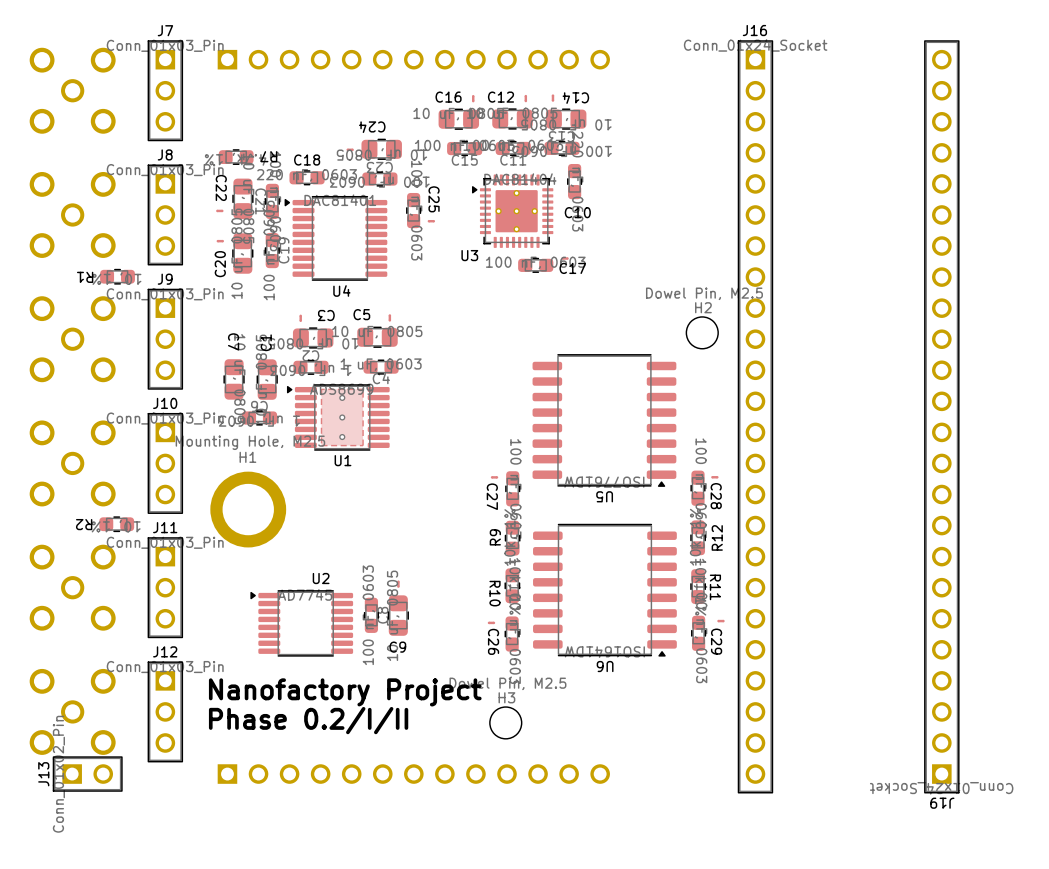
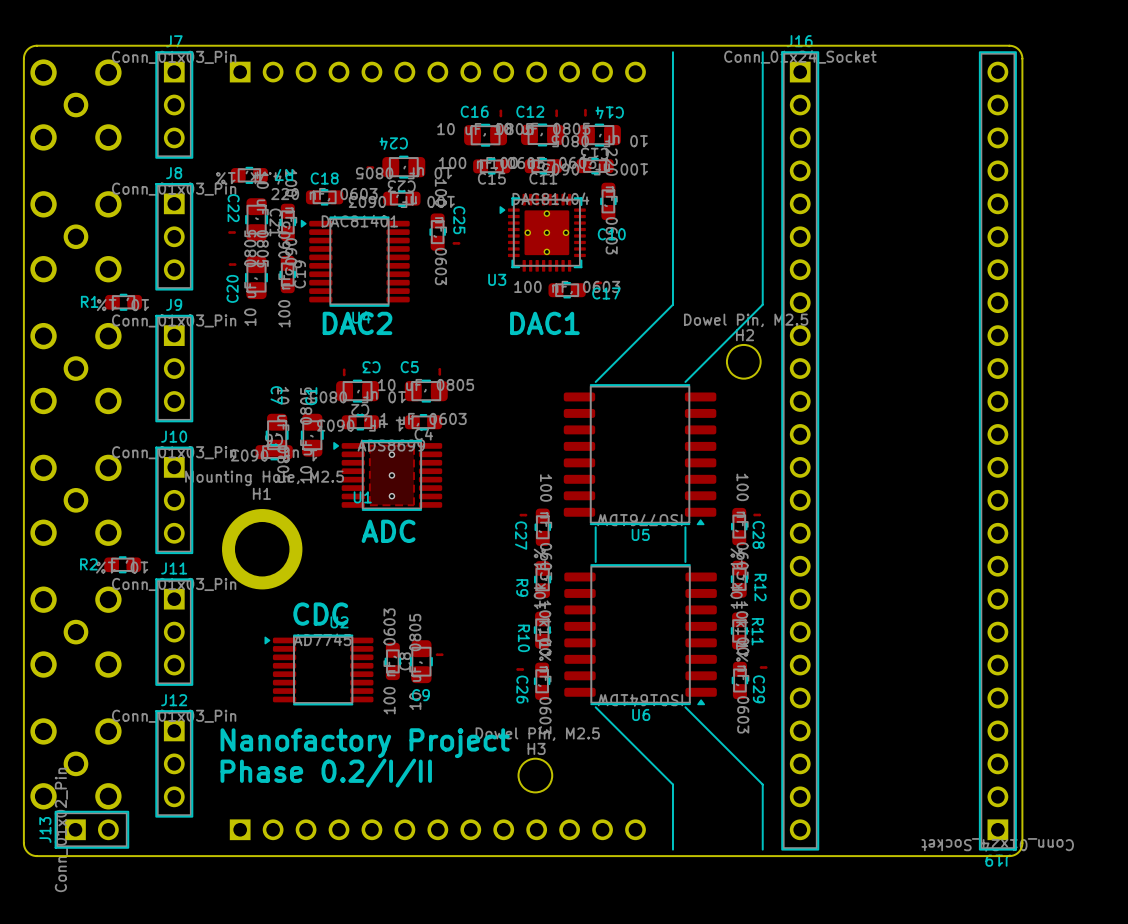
board edge: none -> (36, 45) (1009, 45) (1017, 48) (1022, 58) (1022, 843) (1019, 851) (1009, 856) (36, 856) (28, 853) (23, 843) (23, 58) (27, 49) (36, 45)
line: none -> (672, 52) (672, 304) (595, 381)
line: none -> (762, 52) (762, 304) (685, 381)
R1 name rotation: 0° (85, 277) -> 180° (89, 301)
text: none -> DAC2 (357, 323)
text: none -> DAC1 (544, 323)
part: (389, 317) -> none
part: (300, 318) -> none
C3 position: (313, 337) -> (357, 391)
C5 position: (377, 337) -> (426, 391)
part: none -> (344, 372)
part: none -> (439, 371)
C2 position: (310, 367) -> (360, 422)
C4 position: (381, 367) -> (423, 422)
C7 position: (234, 379) -> (277, 435)
C1 position: (267, 379) -> (312, 435)
zone outline: (321, 389) (363, 389) (363, 445) (321, 445) (321, 389) -> (369, 445) (413, 445) (413, 505) (369, 505) (369, 445)
via: (342, 397) -> none
U1 position: (338, 417) -> (387, 475)
via: (342, 417) -> none
via: none -> (391, 454)
via: (342, 437) -> none
via: none -> (391, 475)
via: none -> (391, 496)
line: none -> (595, 527) (595, 562)
line: none -> (685, 527) (685, 562)
text: none -> ADC (388, 531)
U5 name rotation: 0° (604, 496) -> 180° (640, 534)
R2 name rotation: 0° (84, 524) -> 180° (88, 564)
R9 name rotation: 0° (495, 537) -> 180° (522, 587)
R12 name rotation: 0° (717, 537) -> 180° (760, 587)
text: none -> CDC (320, 614)
part rotation: 0° (398, 584) -> 90° clockwise (439, 654)
part position: (398, 584) -> (439, 654)
line: none -> (595, 707) (672, 784) (672, 849)
line: none -> (685, 707) (762, 784) (762, 849)
U6 name rotation: 0° (605, 666) -> 180° (641, 714)

